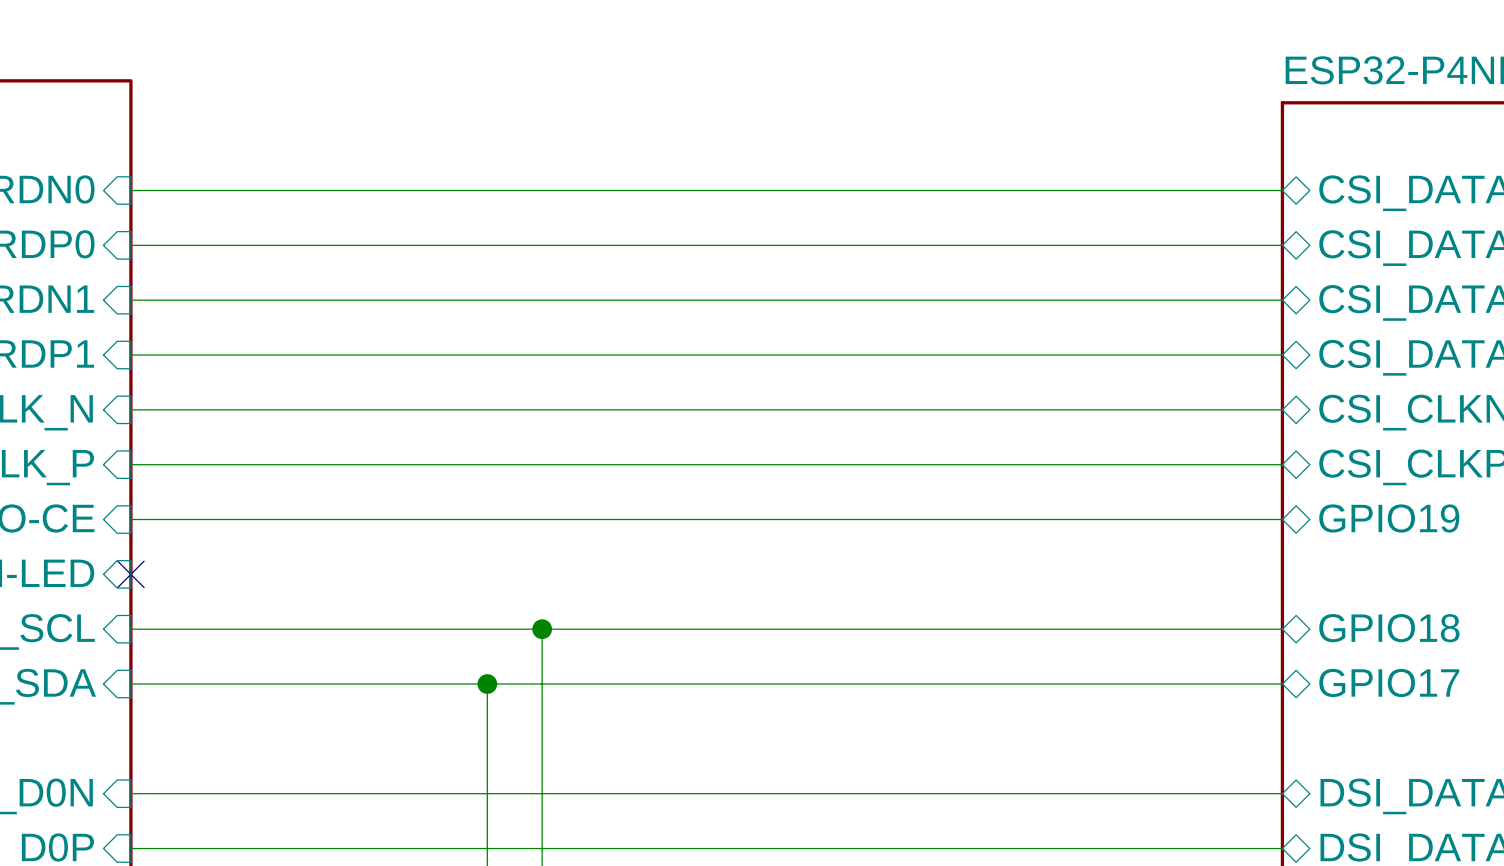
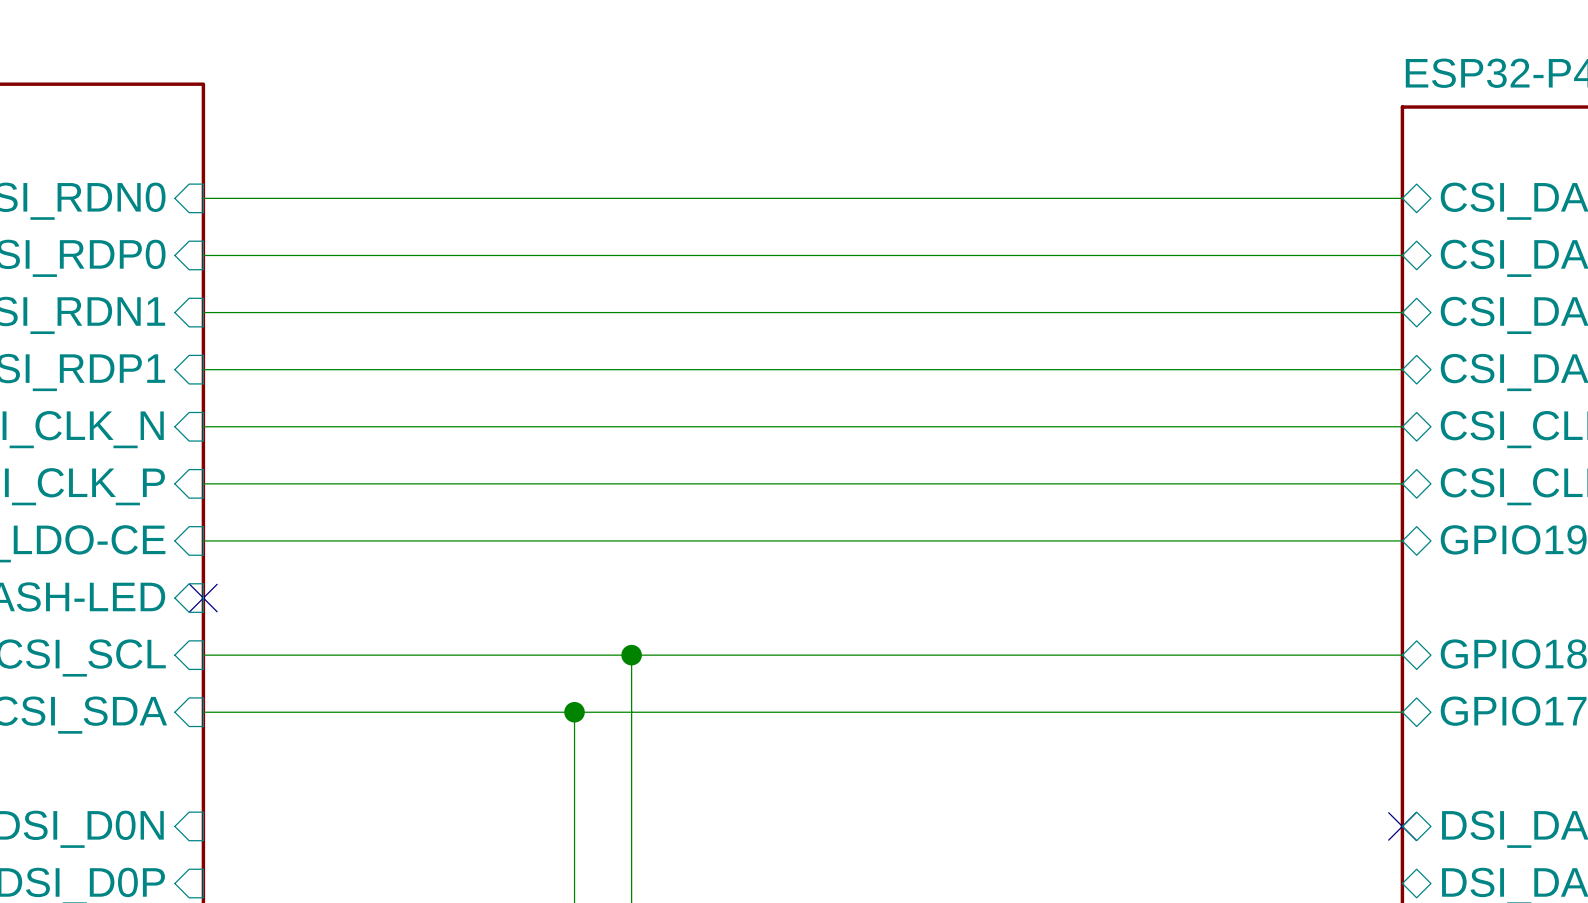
wire: (130, 793) (1282, 793) -> none
no-connect mark: none -> (1402, 826)
wire: (130, 848) (1282, 848) -> none

